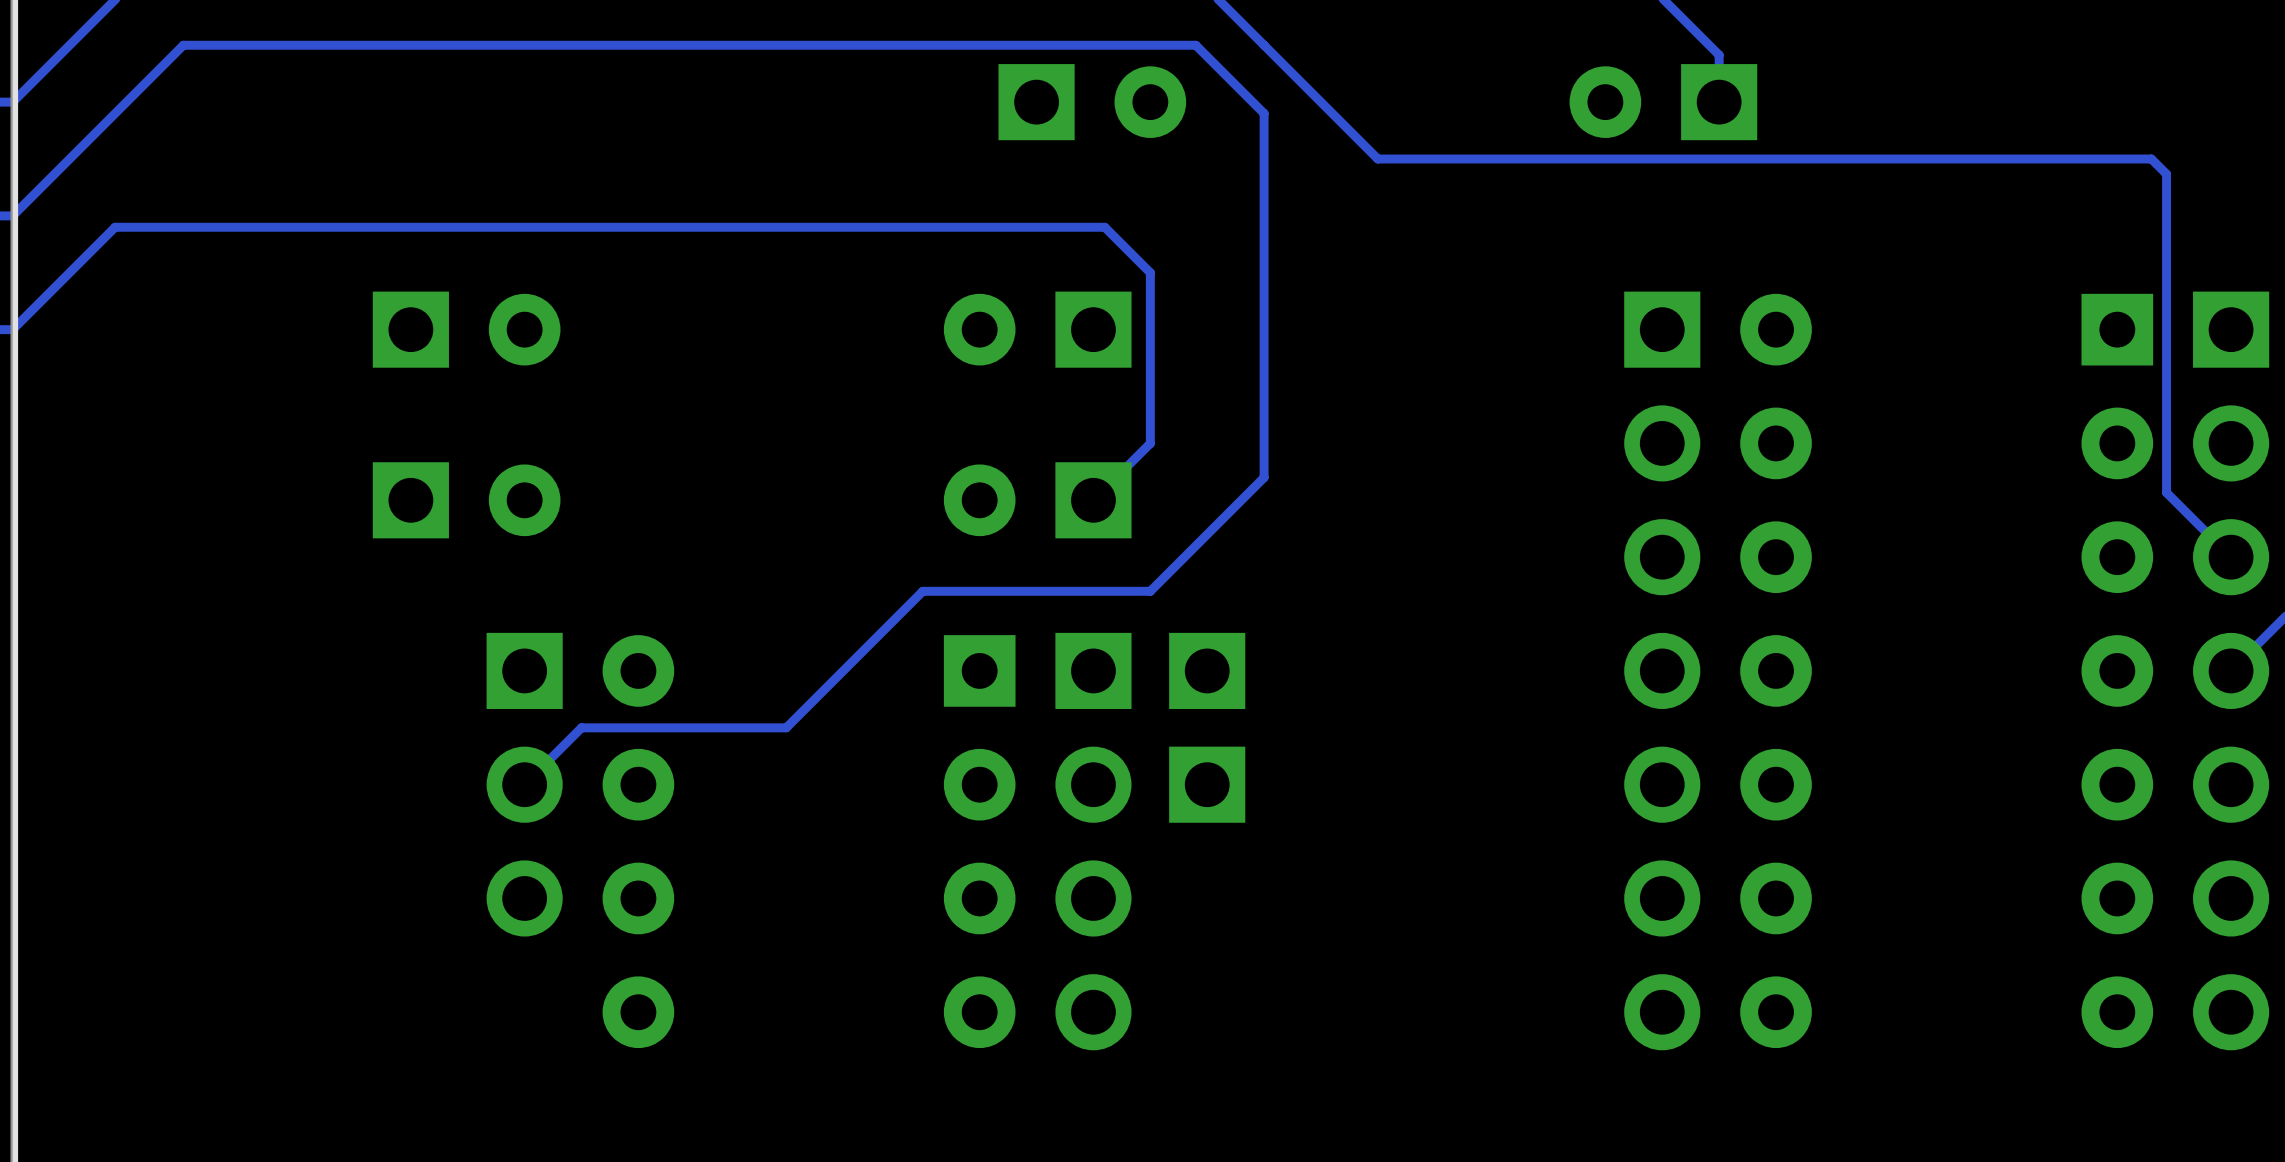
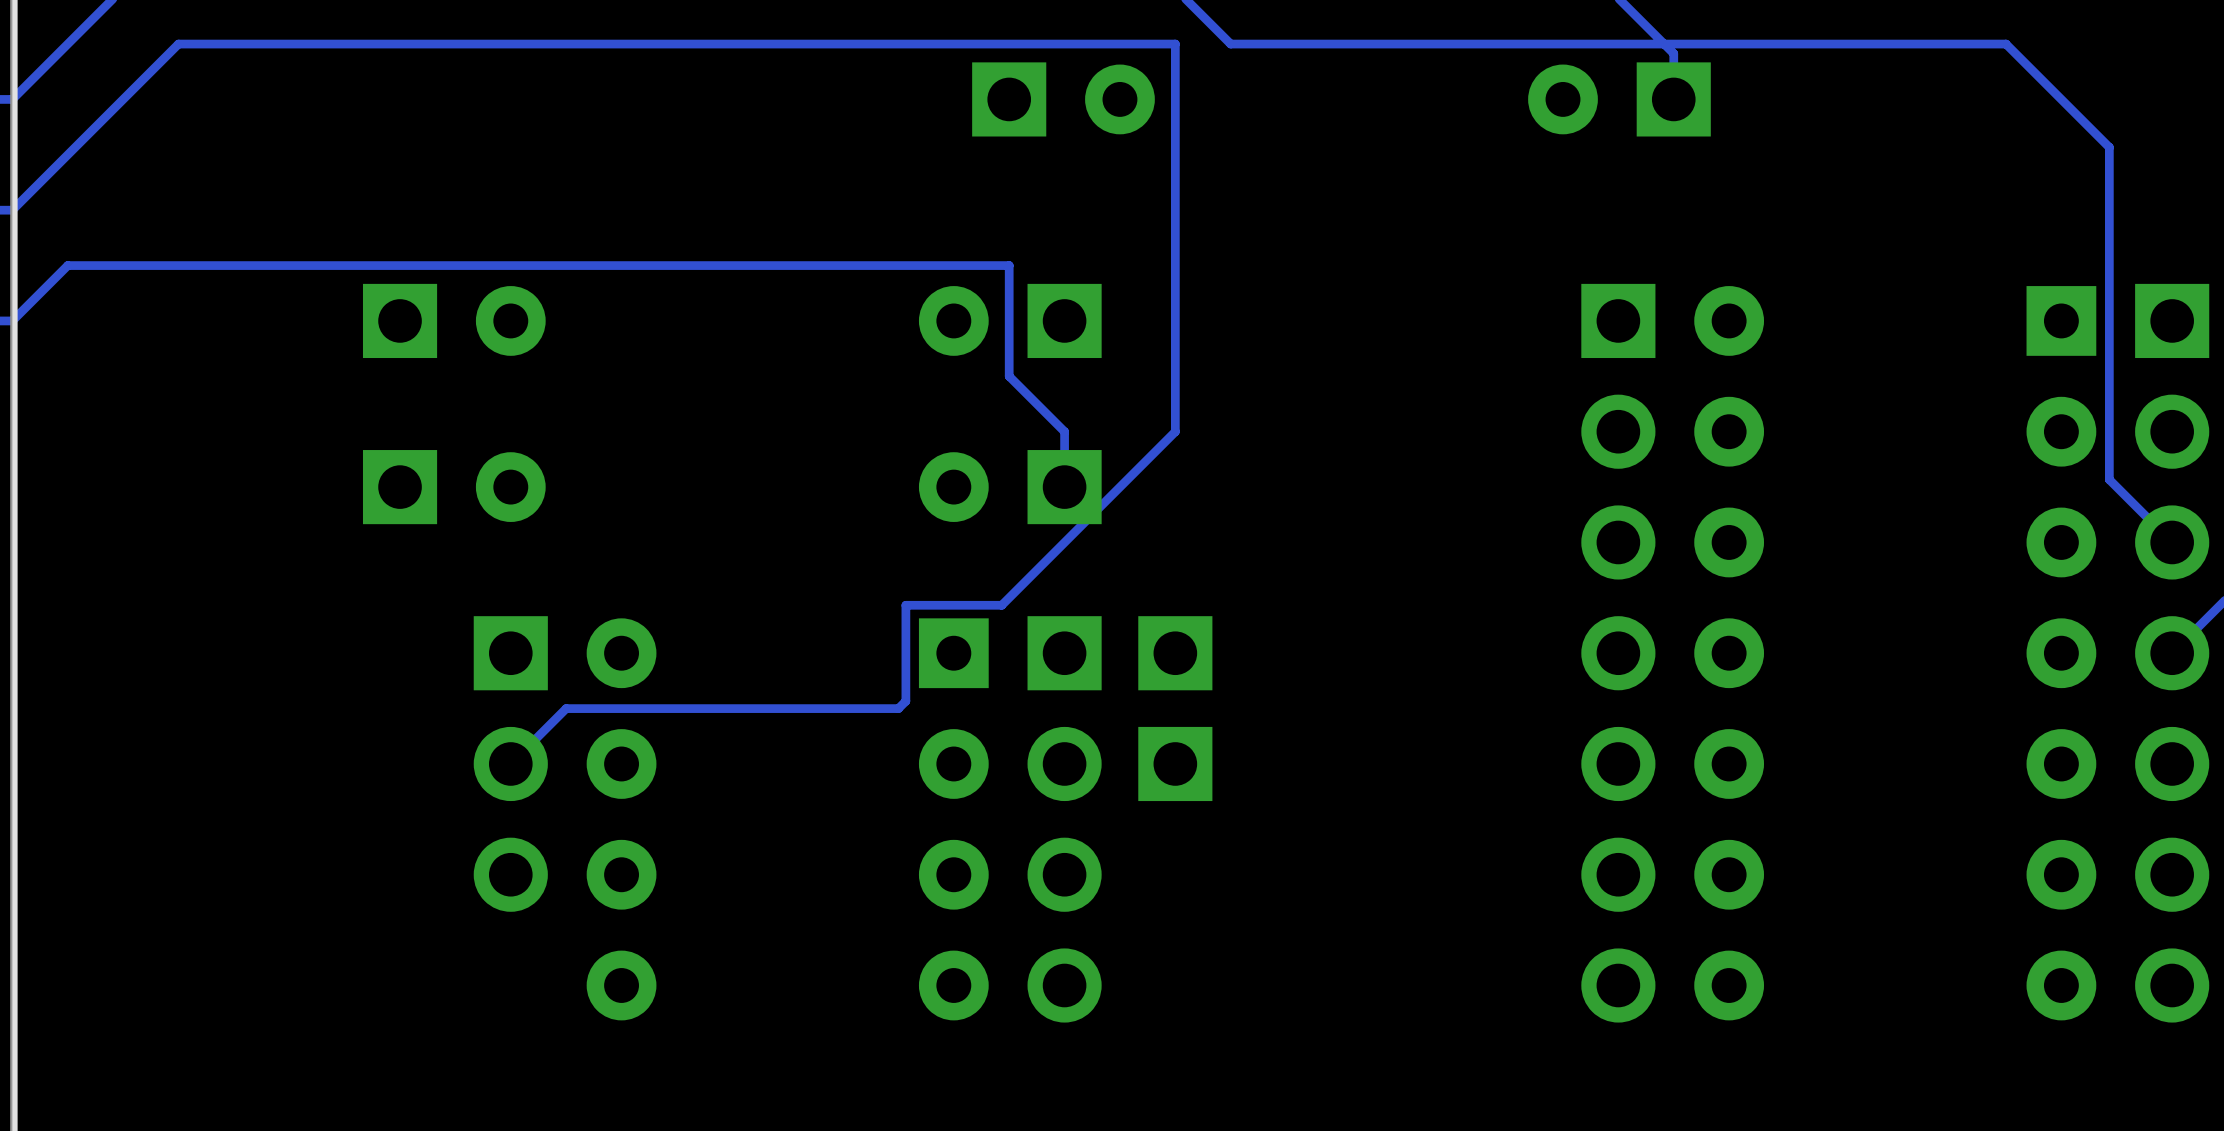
track: (1195, 45) (1264, 113) (1264, 477) (1150, 591) (922, 591) (786, 727) -> (1164, 44) (1175, 44) (1175, 431) (1001, 605) (905, 605) (905, 701) (898, 708) (765, 708)
track: (1264, 45) (1377, 159) (2151, 159) (2166, 174) -> (1230, 44) (2006, 44) (2109, 147) (2109, 169)
track: (69, 272) (115, 227) (1104, 227) (1150, 272) (1150, 443) (1093, 500) -> (67, 265) (1009, 265) (1009, 376) (1064, 431) (1064, 487)

